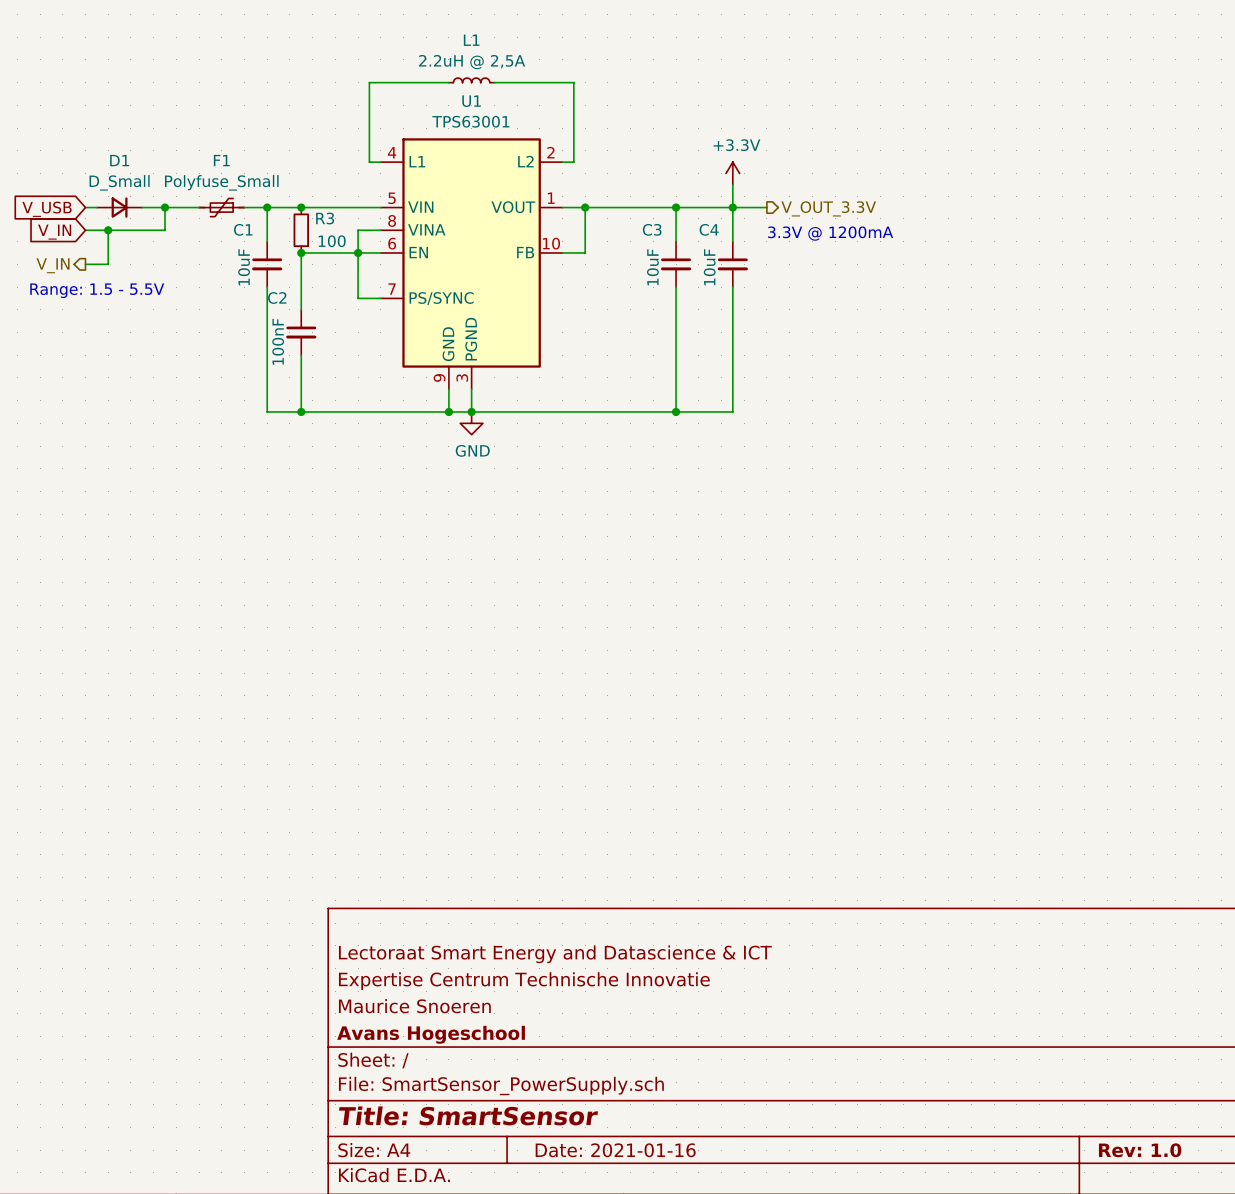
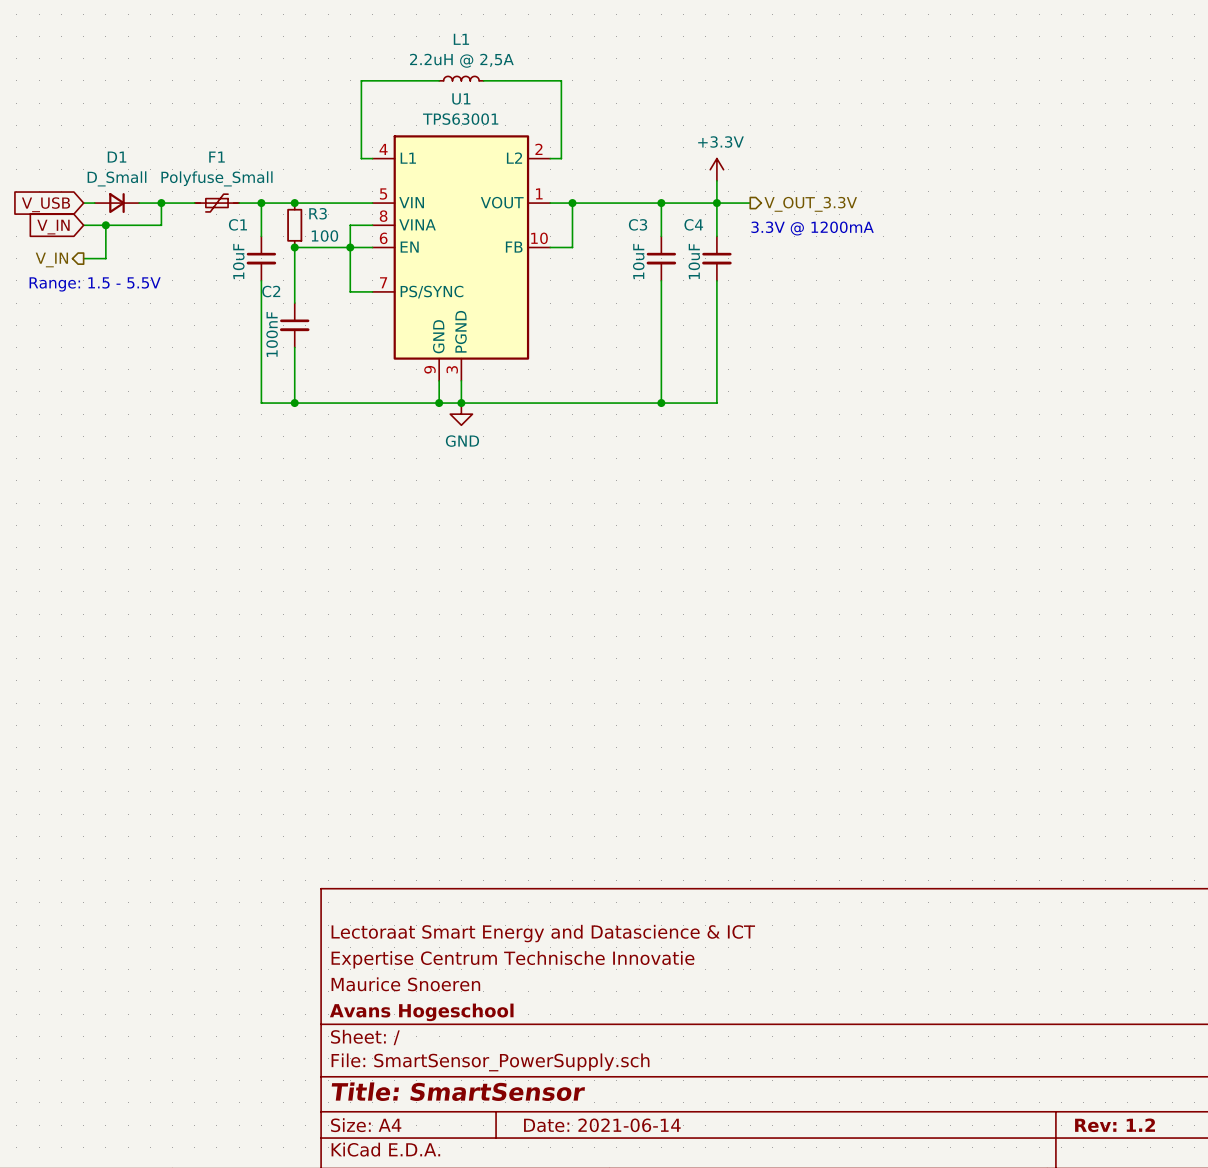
title block: Date: 2021-01-16 (615, 1150) -> Date: 2021-06-14 (602, 1125)
title block: Rev: 1.0 (1140, 1150) -> Rev: 1.2 (1115, 1125)

